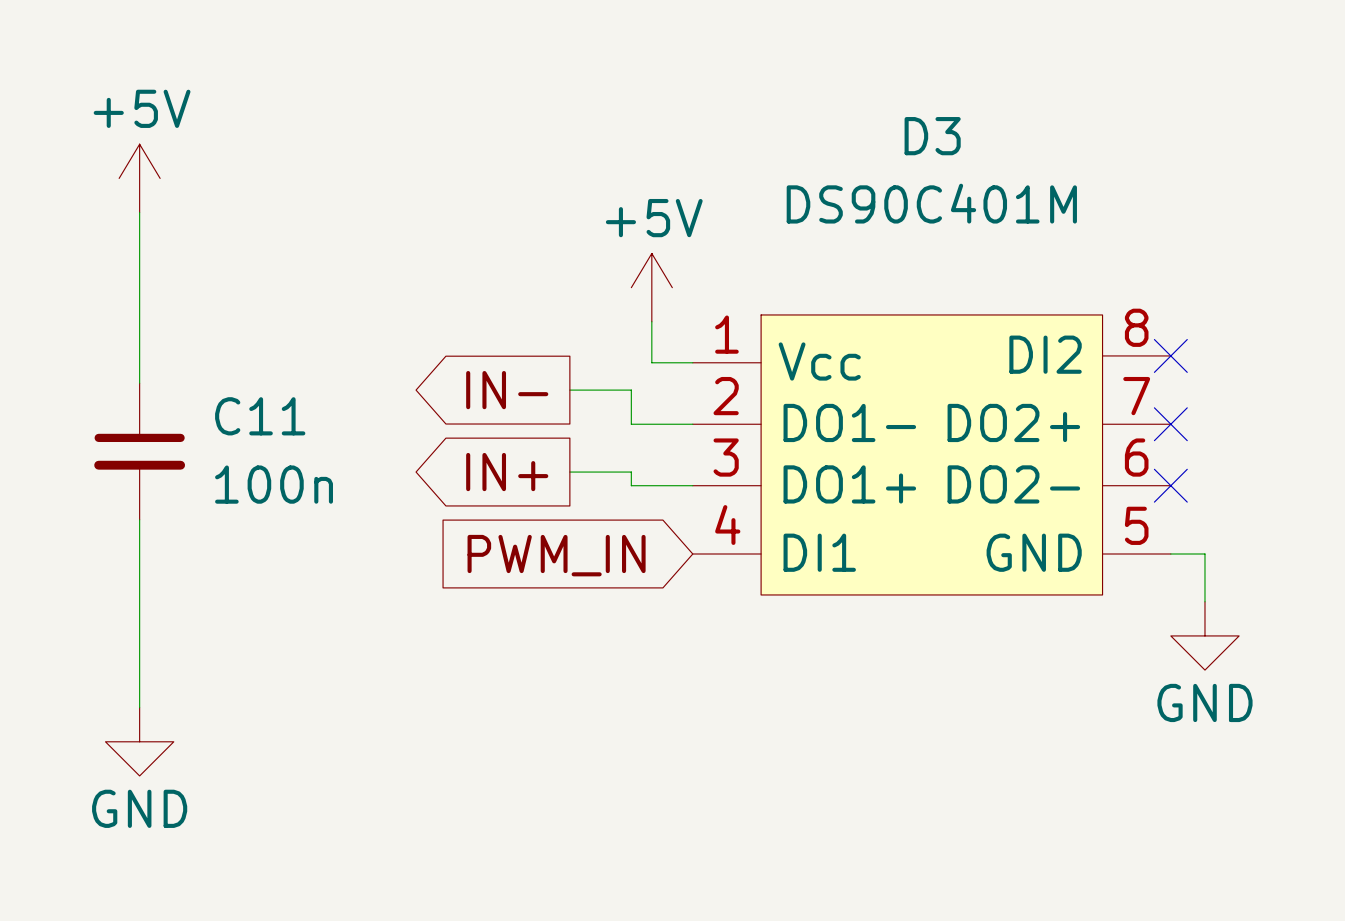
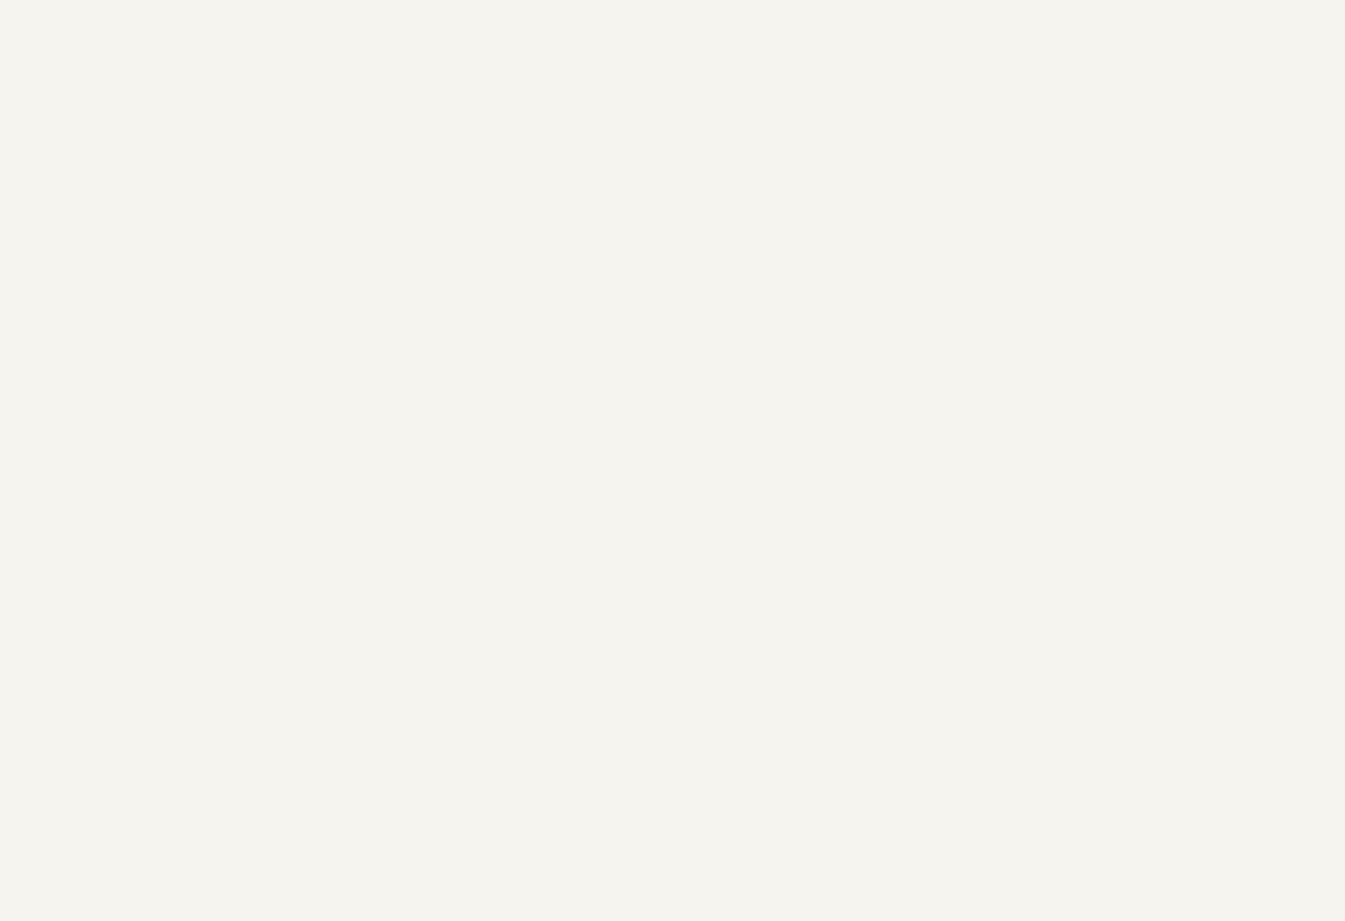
power symbol: +5V (139, 178) -> none
wire: (139, 212) (139, 383) -> none
power symbol: +5V (651, 287) -> none
wire: (651, 321) (651, 362) (692, 362) -> none
no-connect mark: (1170, 355) -> none
global label: IN- (507, 390) -> none
wire: (569, 390) (631, 390) (631, 424) (692, 424) -> none
no-connect mark: (1170, 424) -> none
C11: 100n (139, 451) -> none
D3: DS90C401M (931, 454) -> none
global label: IN+ (507, 472) -> none
wire: (569, 472) (631, 472) (631, 485) (692, 485) -> none
no-connect mark: (1170, 485) -> none
wire: (139, 519) (139, 707) -> none
wire: (1170, 554) (1204, 554) (1204, 601) -> none
global label: PWM_IN (556, 555) -> none
power symbol: GND (1204, 635) -> none
power symbol: GND (139, 741) -> none

